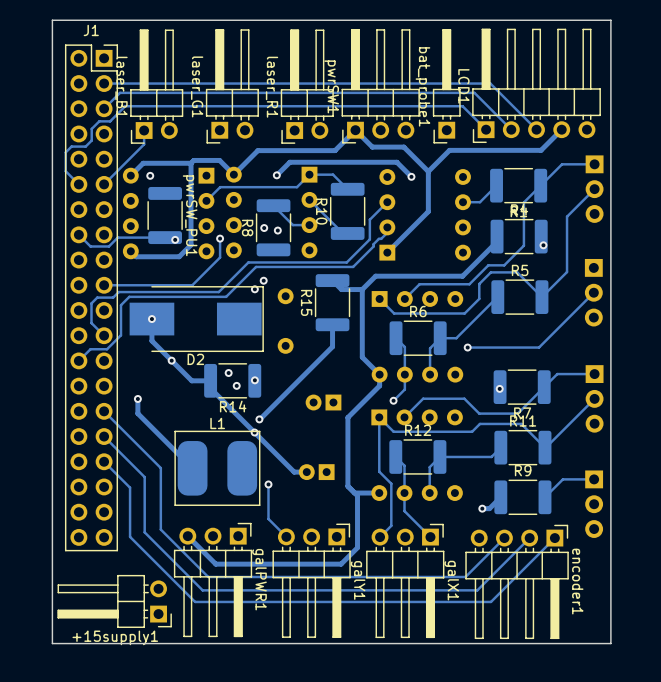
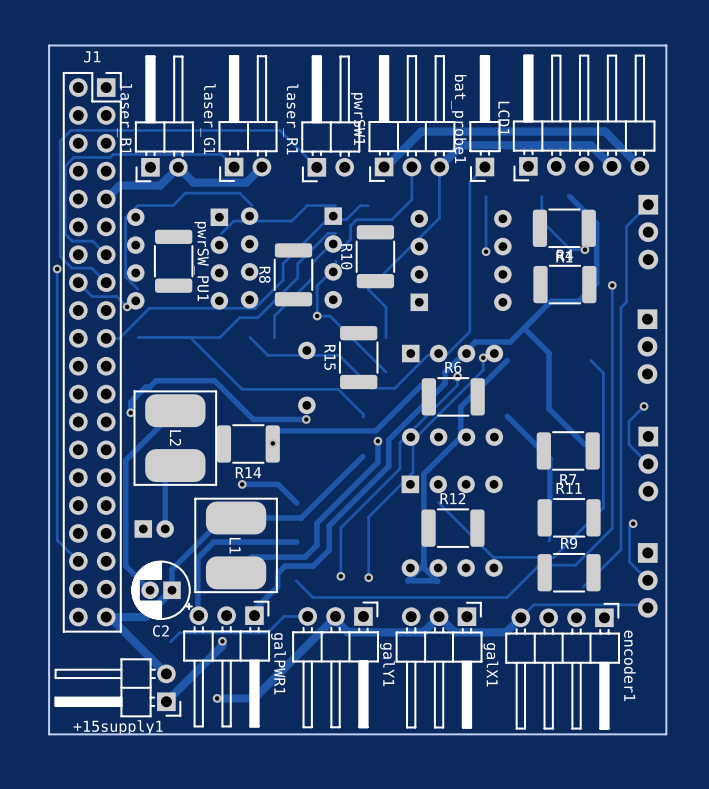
track: (104, 83) (490, 83) (536, 129) -> none
track: (104, 108) (119, 92) (474, 92) (511, 129) -> none
track: (486, 129) (462, 106) (125, 106) (110, 121) (99, 121) (91, 128) (91, 140) (85, 146) (71, 146) (65, 152) (65, 171) (78, 184) -> none
track: (561, 129) (541, 150) (449, 150) (428, 171) -> (612, 166) (590, 145) (461, 145) (439, 167) (439, 218) (368, 289) (386, 307) (386, 337)
track: none -> (639, 166) (605, 131) (421, 131) (384, 166)
track: (144, 130) (144, 144) (104, 184) -> none
track: none -> (234, 167) (221, 154) (113, 154) (110, 157) (73, 157) (65, 166) (65, 234) (72, 241) (92, 241) (106, 254)
track: none -> (261, 167) (246, 182) (193, 182) (178, 167) (160, 185) (119, 185) (106, 199)
track: none -> (316, 167) (279, 130) (70, 130) (60, 140) (60, 256) (71, 268) (91, 268) (106, 282)
track: none -> (411, 166) (411, 199) (391, 219) (356, 219) (350, 225) (350, 239) (342, 247) (327, 247) (312, 263) (312, 278) (274, 316) (274, 337)
track: none -> (484, 166) (469, 182) (469, 331) (446, 355) (427, 355) (394, 388) (372, 388) (339, 355) (267, 355) (250, 337)
track: none -> (486, 196) (486, 251)
track: none -> (541, 196) (541, 221) (570, 249) (584, 249)
track: none -> (569, 196) (596, 223) (596, 283) (578, 301) (550, 301) (510, 341) (475, 341) (445, 372) (445, 383) (388, 439) (388, 466) (329, 525) (329, 550) (313, 566) (285, 566) (277, 573) (277, 586) (254, 609) (254, 615)
track: (191, 163) (143, 163) (130, 175) -> none
track: (191, 163) (191, 244) (179, 256) (136, 256) (130, 251) -> none
track: (191, 163) (193, 160) (219, 160) (233, 174) (257, 150) (335, 150) (355, 130) (372, 147) (403, 147) (428, 171) -> none
track: (594, 164) (562, 164) (523, 202) (523, 245) (504, 265) (488, 265) (469, 284) (419, 284) (404, 298) -> (648, 204) (626, 226) (626, 302) (620, 307) (620, 549) (583, 586)
track: none -> (252, 205) (239, 193) (185, 193) (172, 205) (137, 205) (125, 217) (125, 276) (137, 289)
track: none -> (335, 205) (307, 205) (291, 221) (233, 221) (221, 233)
track: (428, 171) (428, 211) (387, 252) -> none
via: (150, 175) -> none
track: (276, 175) (289, 162) (396, 162) (411, 176) -> none
via: (276, 175) -> none
via position: (411, 176) -> (486, 251)
track: (496, 185) (479, 202) (463, 202) -> none
track: (347, 189) (333, 174) (309, 174) (296, 187) (220, 187) (206, 200) -> none
track: (594, 189) (567, 216) (567, 272) (541, 297) (517, 272) (490, 272) (479, 284) (479, 298) (464, 313) (394, 313) (379, 298) -> none
track: none -> (335, 233) (328, 233) (297, 263) (297, 277) (257, 317) (239, 317) (219, 337) (138, 337)
track: (309, 199) (343, 233) (347, 233) -> none
track: (387, 202) (369, 219) (369, 239) (346, 262) (248, 262) (218, 292) (118, 292) (113, 297) (97, 297) (91, 303) (91, 323) (104, 335) -> none
track: (273, 205) (292, 225) (309, 225) -> none
via: none -> (584, 249)
track: none -> (335, 261) (335, 267) (317, 285) (317, 316) (329, 316) (386, 372)
track: none -> (57, 268) (57, 540) (78, 561)
via: none -> (57, 268)
track: (387, 227) (387, 232) (378, 238) (353, 266) (256, 266) (226, 296) (129, 296) (120, 305) (120, 335) (107, 349) (90, 349) (78, 360) -> none
via: (264, 228) -> none
via: (277, 230) -> none
track: (497, 236) (497, 241) (462, 276) (375, 276) (362, 289) -> none
track: (165, 237) (117, 237) (108, 246) (90, 246) -> (127, 306) (116, 296) (91, 295)
track: none -> (612, 285) (612, 528) (575, 565) (539, 565) (506, 597) (312, 597) (296, 580)
track: (220, 238) (220, 257) (192, 285) (116, 285) -> (368, 205) (360, 205) (346, 219) (327, 219) (283, 263) (283, 280) (255, 308) (149, 308) (119, 338)
via: (220, 238) -> none
via: (175, 239) -> none
via position: (543, 245) -> (612, 285)
via: none -> (127, 306)
via: none -> (317, 316)
track: none -> (524, 328) (549, 353) (549, 408) (584, 444) (590, 444)
via: (263, 280) -> none
track: (332, 280) (341, 289) (362, 289) -> none
track: none -> (190, 337) (242, 389) (338, 389) (363, 414) (363, 417)
via: (254, 289) -> none
track: (362, 289) (362, 357) (379, 374) (379, 385) (347, 417) (347, 486) (357, 495) (357, 547) (341, 564) (215, 564) (187, 536) -> (296, 542) (213, 542) (197, 557) (198, 615)
track: (593, 292) (539, 347) (467, 347) -> none
track: (497, 297) (456, 338) (440, 338) (430, 348) (430, 374) -> none
R5: (519, 297) -> none
track: none -> (483, 357) (483, 370) (413, 440) (413, 472) (368, 516) (368, 577)
via: none -> (483, 357)
track: none -> (507, 360) (460, 406) (460, 437) (423, 474) (423, 567) (437, 581)
track: none -> (590, 360) (603, 373) (603, 507) (553, 557) (493, 557) (438, 502)
track: (151, 319) (151, 340) (191, 380) (210, 380) (210, 388) (294, 472) (306, 472) -> none
via: (151, 319) -> none
D2: (196, 319) -> none
track: none -> (457, 376) (457, 385) (399, 442) (399, 468) (340, 527) (340, 576)
via: none -> (457, 376)
track: (332, 324) (332, 346) (259, 419) -> none
track: none -> (421, 385) (375, 430) (272, 430)
track: (396, 338) (404, 347) (404, 389) (393, 400) -> none
via: none -> (644, 406)
via: (467, 347) -> none
track: none -> (175, 410) (125, 460) (125, 565) (150, 590)
track: none -> (130, 412) (130, 402) (145, 387) (149, 387) (156, 380) (214, 380) (253, 419) (306, 419)
via: none -> (130, 412)
track: none -> (507, 416) (549, 458) (549, 540)
via: none -> (306, 419)
via: (171, 360) -> none
via: (228, 373) -> none
track: (594, 374) (557, 374) (517, 413) (479, 413) (464, 398) (423, 398) (404, 417) -> none
L2: none -> (175, 438)
track: none -> (377, 441) (377, 462) (316, 523) (316, 545) (304, 557) (251, 557) (236, 572)
via: none -> (377, 441)
via: (236, 385) -> none
via: (499, 388) -> none
track: none -> (362, 456) (353, 465)
track: (137, 398) (137, 413) (192, 468) (192, 448) -> none
via: (137, 398) -> none
track: (594, 398) (545, 447) (521, 423) (479, 423) (472, 431) (393, 431) (379, 417) (379, 471) (391, 483) (391, 525) (380, 537) -> (648, 463) (629, 444) (629, 421) (644, 406)
track: none -> (175, 465) (165, 475) (165, 528)
track: none -> (353, 465) (301, 517) (223, 517) (172, 569) (172, 590) (145, 617) (106, 617)
via: (393, 400) -> none
part rotation: 0° (323, 402) -> 180° (154, 528)
part position: (323, 402) -> (154, 528)
track: (104, 411) (160, 468) (160, 529) (208, 576) (465, 576) (504, 538) -> none
track: none -> (242, 484) (278, 484) (296, 503)
via: none -> (242, 484)
via: (259, 419) -> none
L1 name position: L1 (217, 423) -> L1 (235, 545)
via: (254, 432) -> none
track: (104, 436) (144, 477) (144, 532) (202, 590) (477, 590) (529, 538) -> none
track: (500, 447) (491, 456) (439, 456) (429, 467) (429, 493) -> none
track: none -> (633, 523) (629, 527) (629, 562) (647, 580)
via: none -> (633, 523)
track: (395, 456) (404, 465) (404, 511) (430, 537) -> none
track: (104, 461) (130, 487) (130, 536) (195, 601) (490, 601) (554, 538) -> none
L1 rotation: 0° (217, 468) -> 90° clockwise (236, 545)
C2 side: top (316, 472) -> bottom (162, 590)
track: (594, 479) (562, 479) (545, 497) -> none
track: (268, 484) (268, 519) (286, 536) -> (170, 641) (179, 632) (267, 632) (284, 616) (307, 616)
via: (268, 484) -> none
track: none -> (423, 564) (407, 580) (437, 580)
track: (379, 493) (354, 493) -> none
track: (500, 497) (489, 508) (482, 508) -> none
via: none -> (340, 576)
via: none -> (368, 577)
via: (482, 508) -> none
track: none -> (647, 607) (644, 604) (533, 604) (506, 632) (454, 632) (439, 616) (423, 632) (347, 632) (335, 620) (335, 616)
track: none -> (109, 617) (168, 673)
track: none -> (335, 617) (254, 698) (217, 698)
track: none -> (222, 641) (222, 645) (166, 701)
via: none -> (222, 641)
via: none -> (217, 698)

